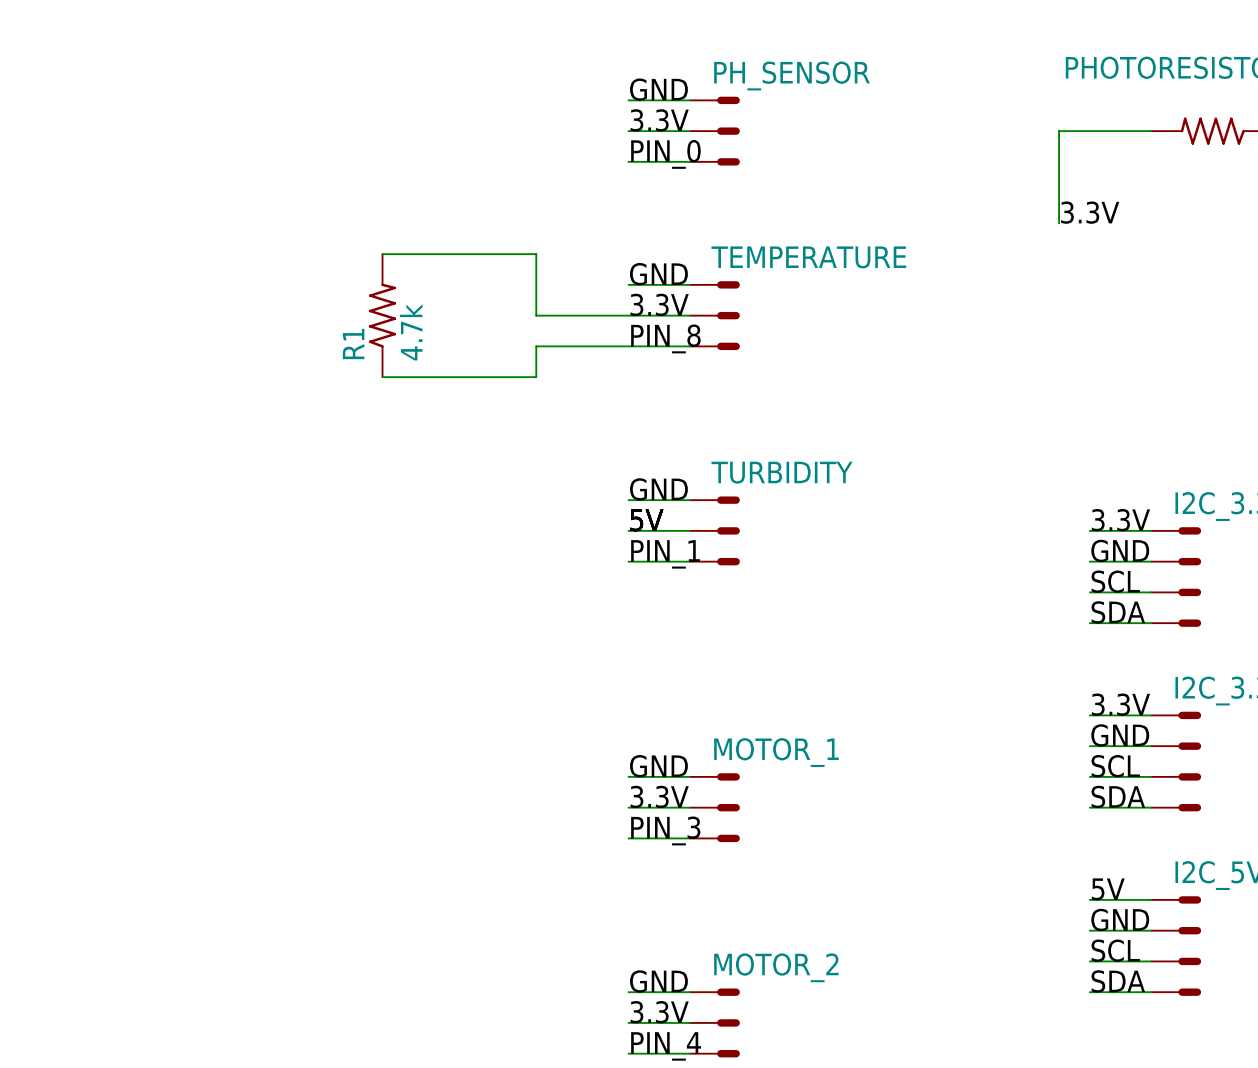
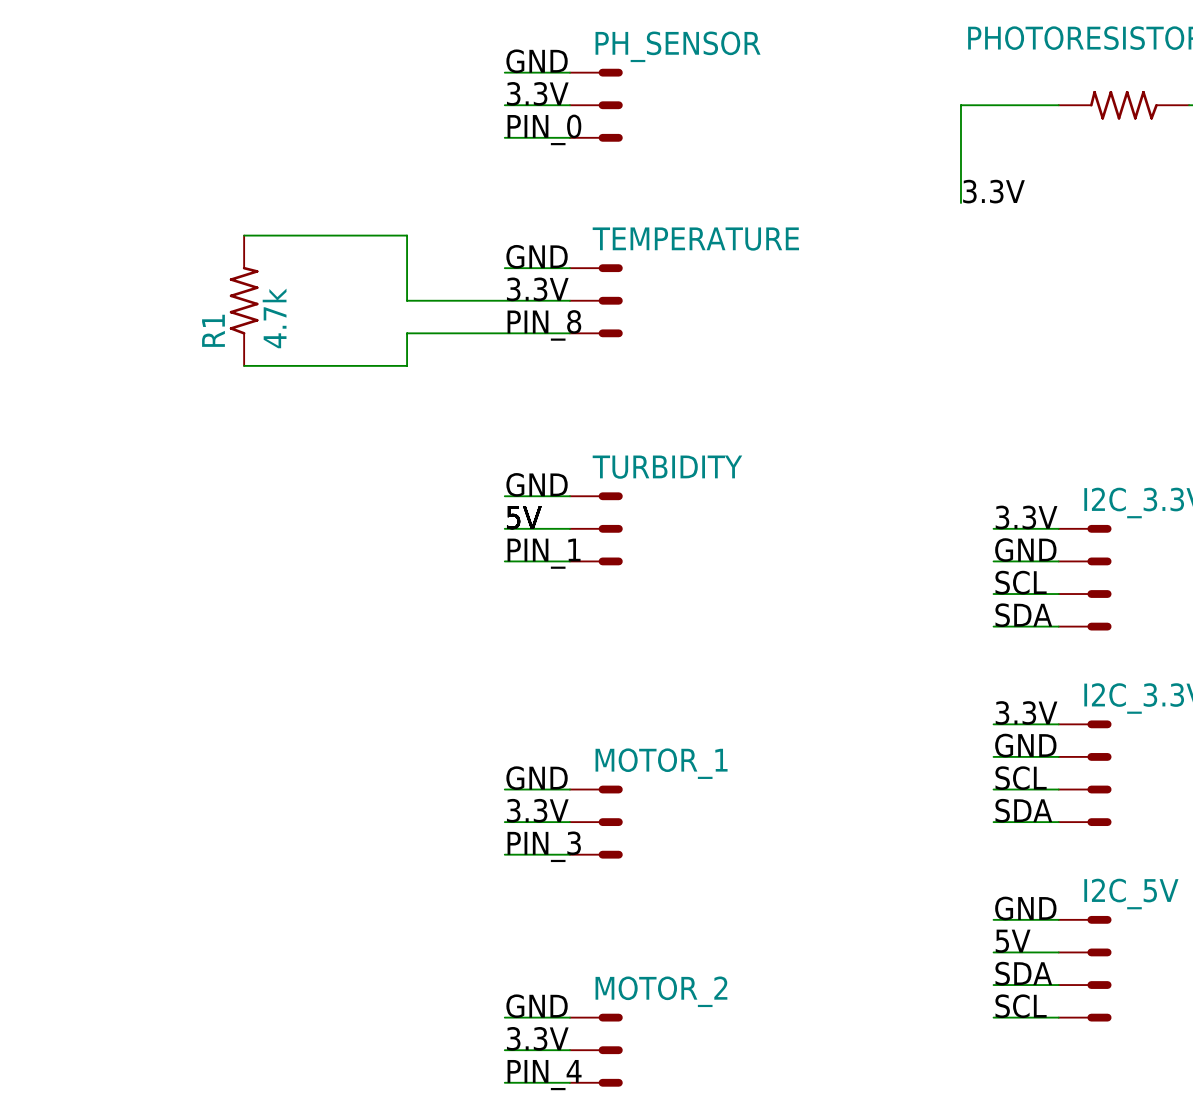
label: 5V (1108, 889) -> GND (1025, 908)
label: GND (1120, 919) -> 5V (1013, 941)
label: SCL (1115, 950) -> SDA (1023, 973)
label: SDA (1118, 981) -> SCL (1021, 1006)

